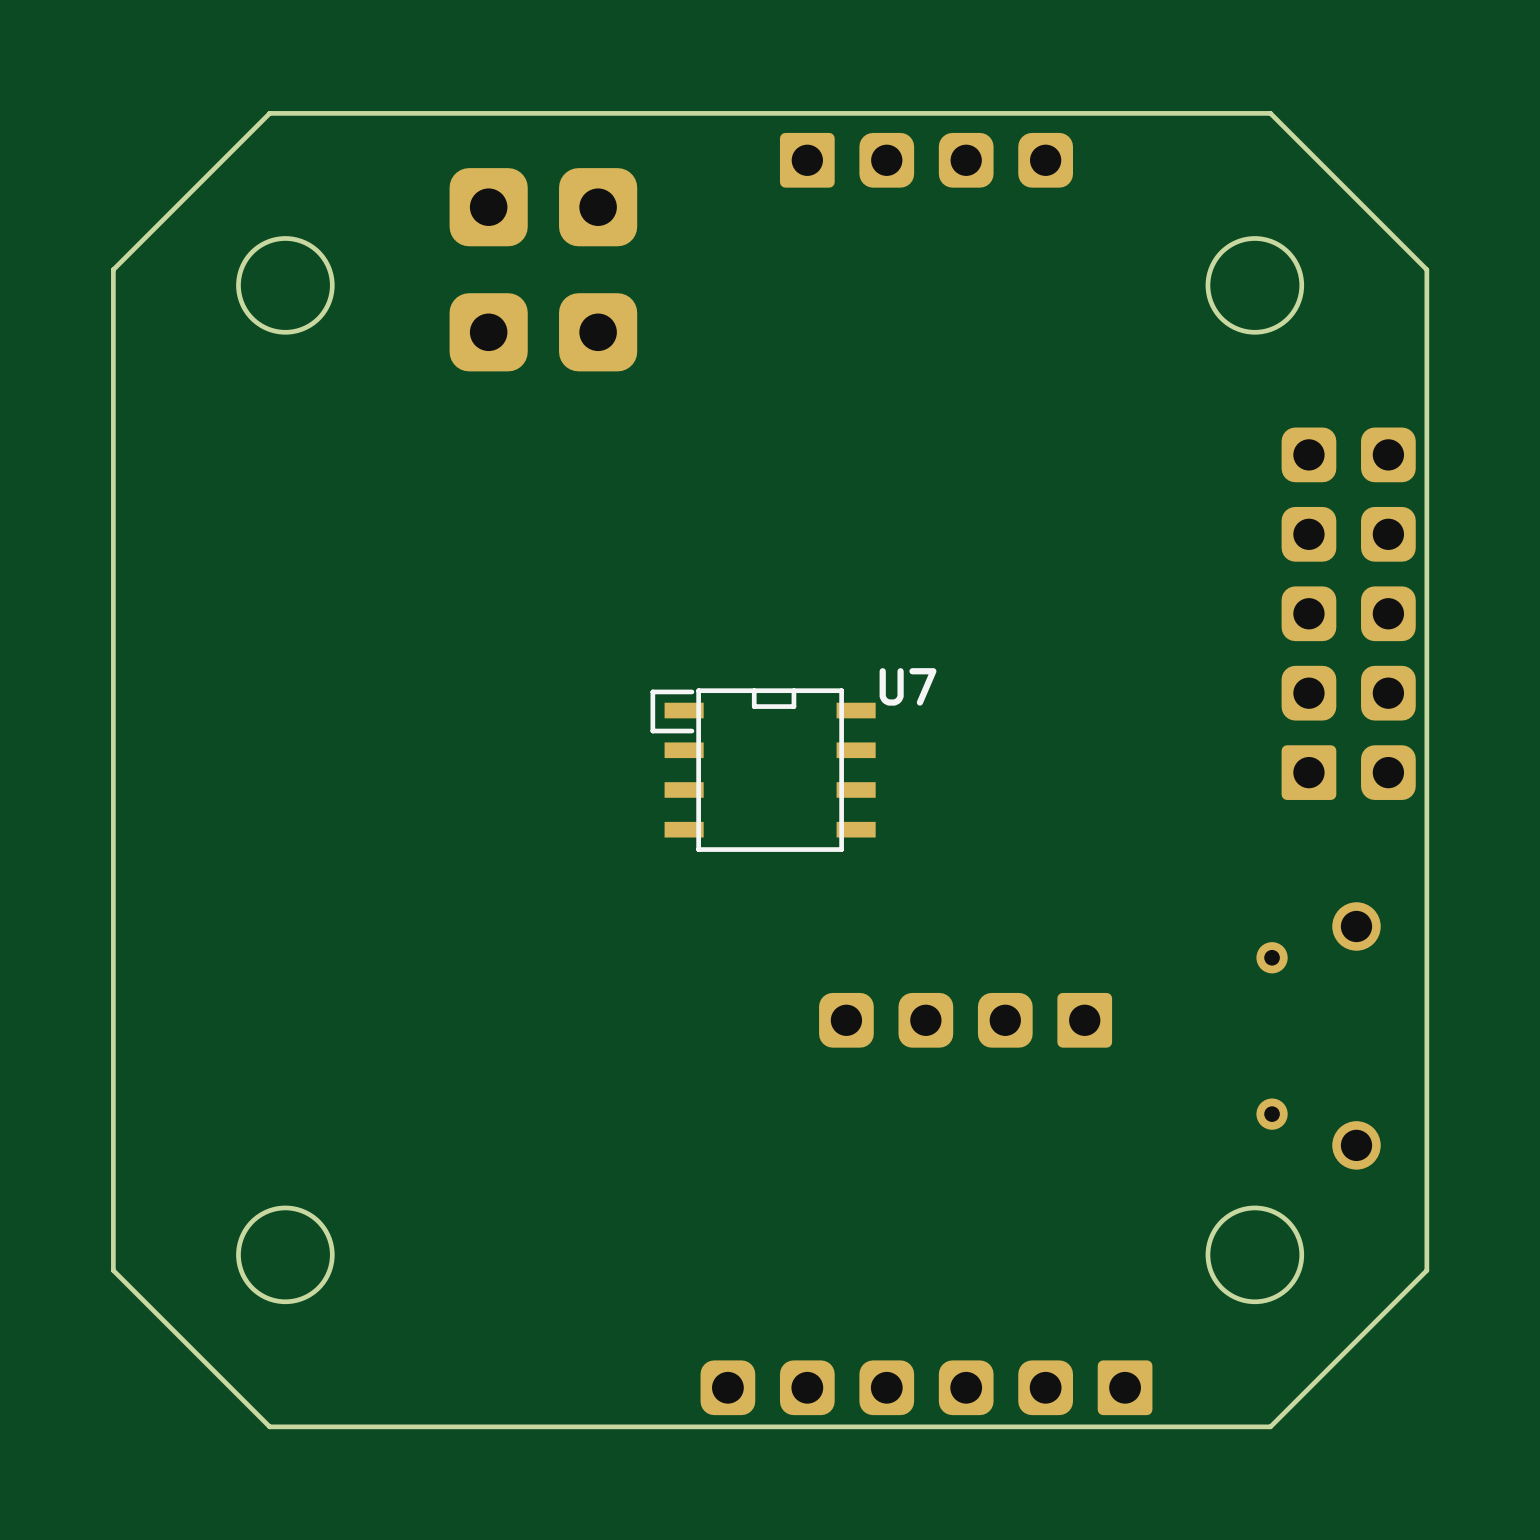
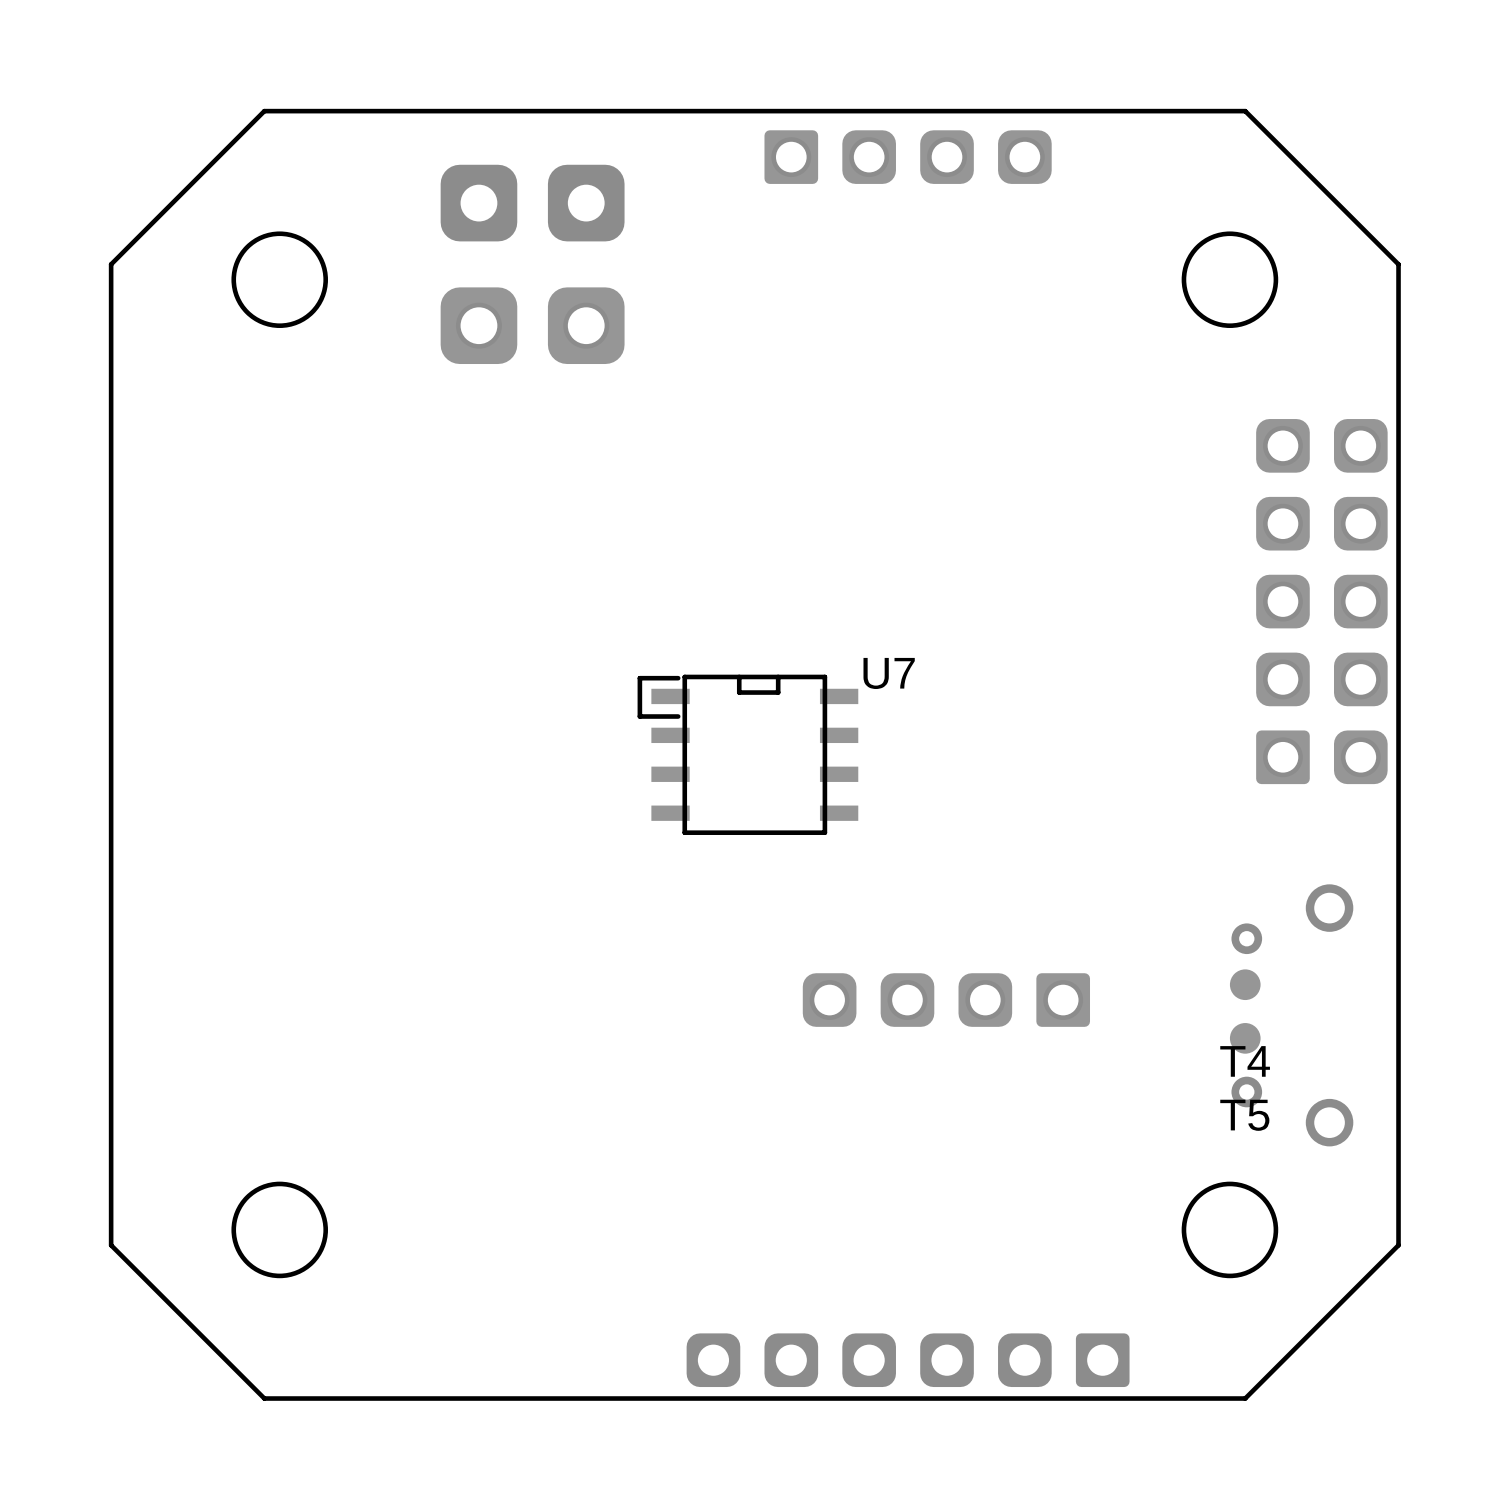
T4: none -> (1245, 984)
T5: none -> (1245, 1038)

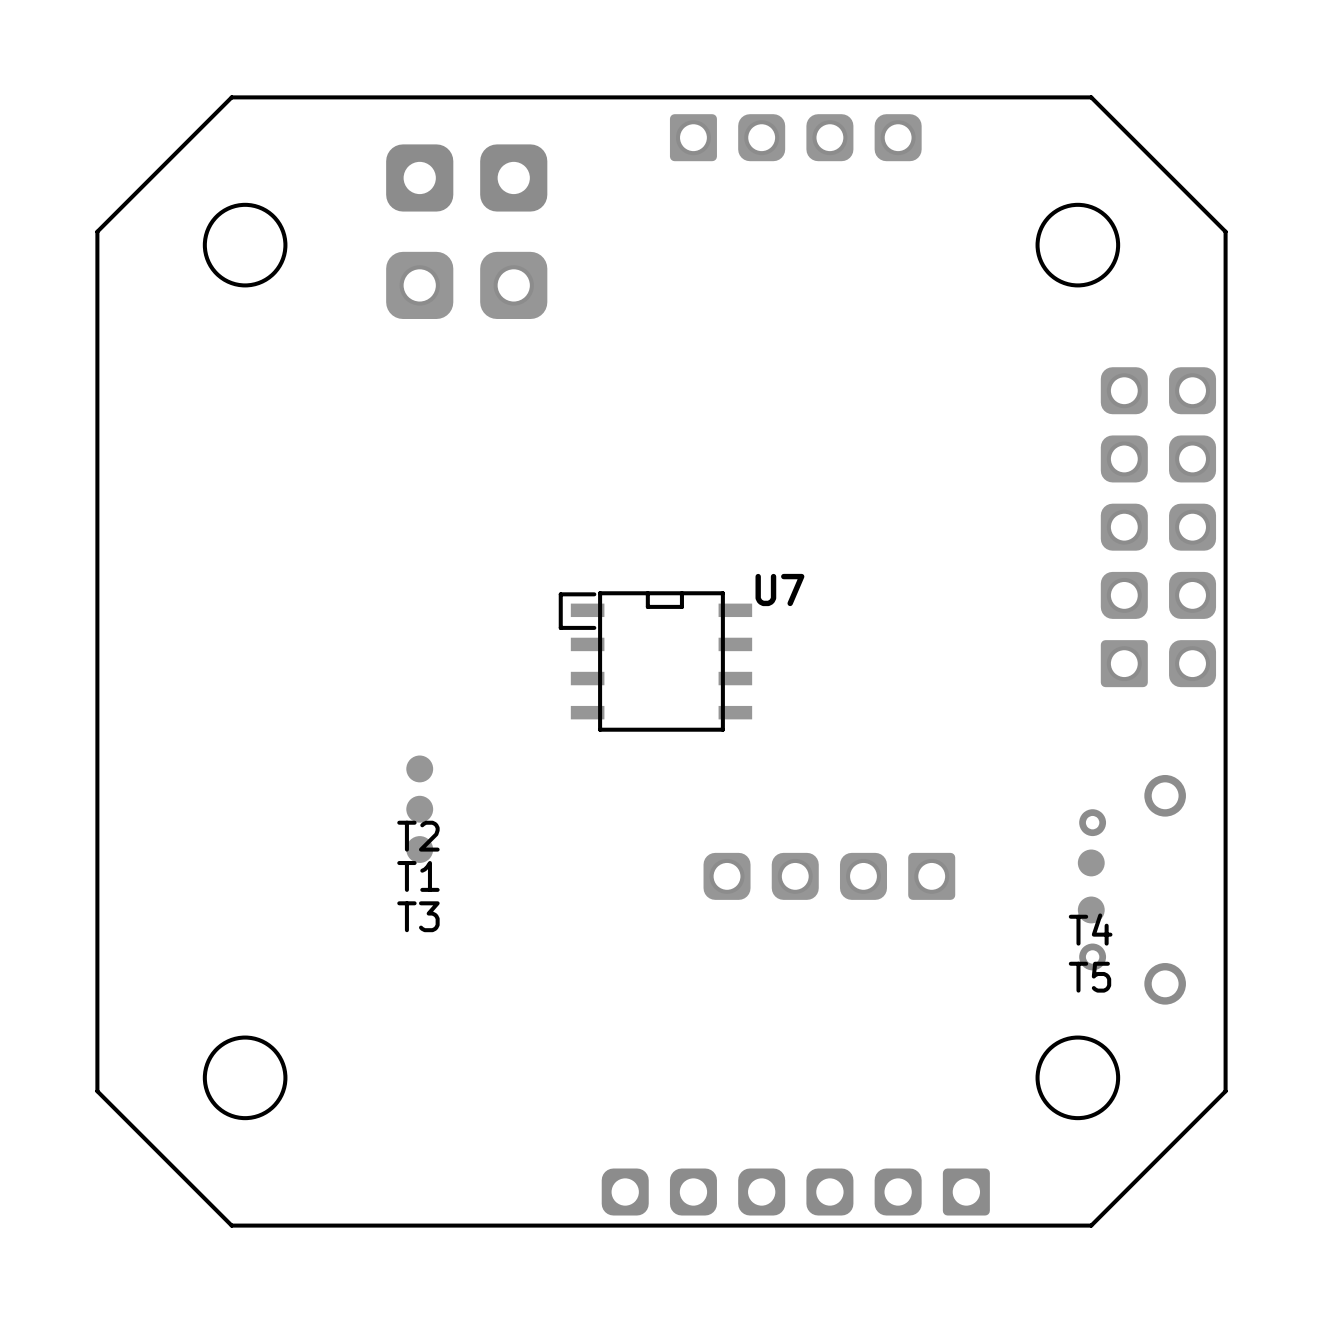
T2: none -> (419, 768)
T1: none -> (419, 809)
T3: none -> (419, 849)

